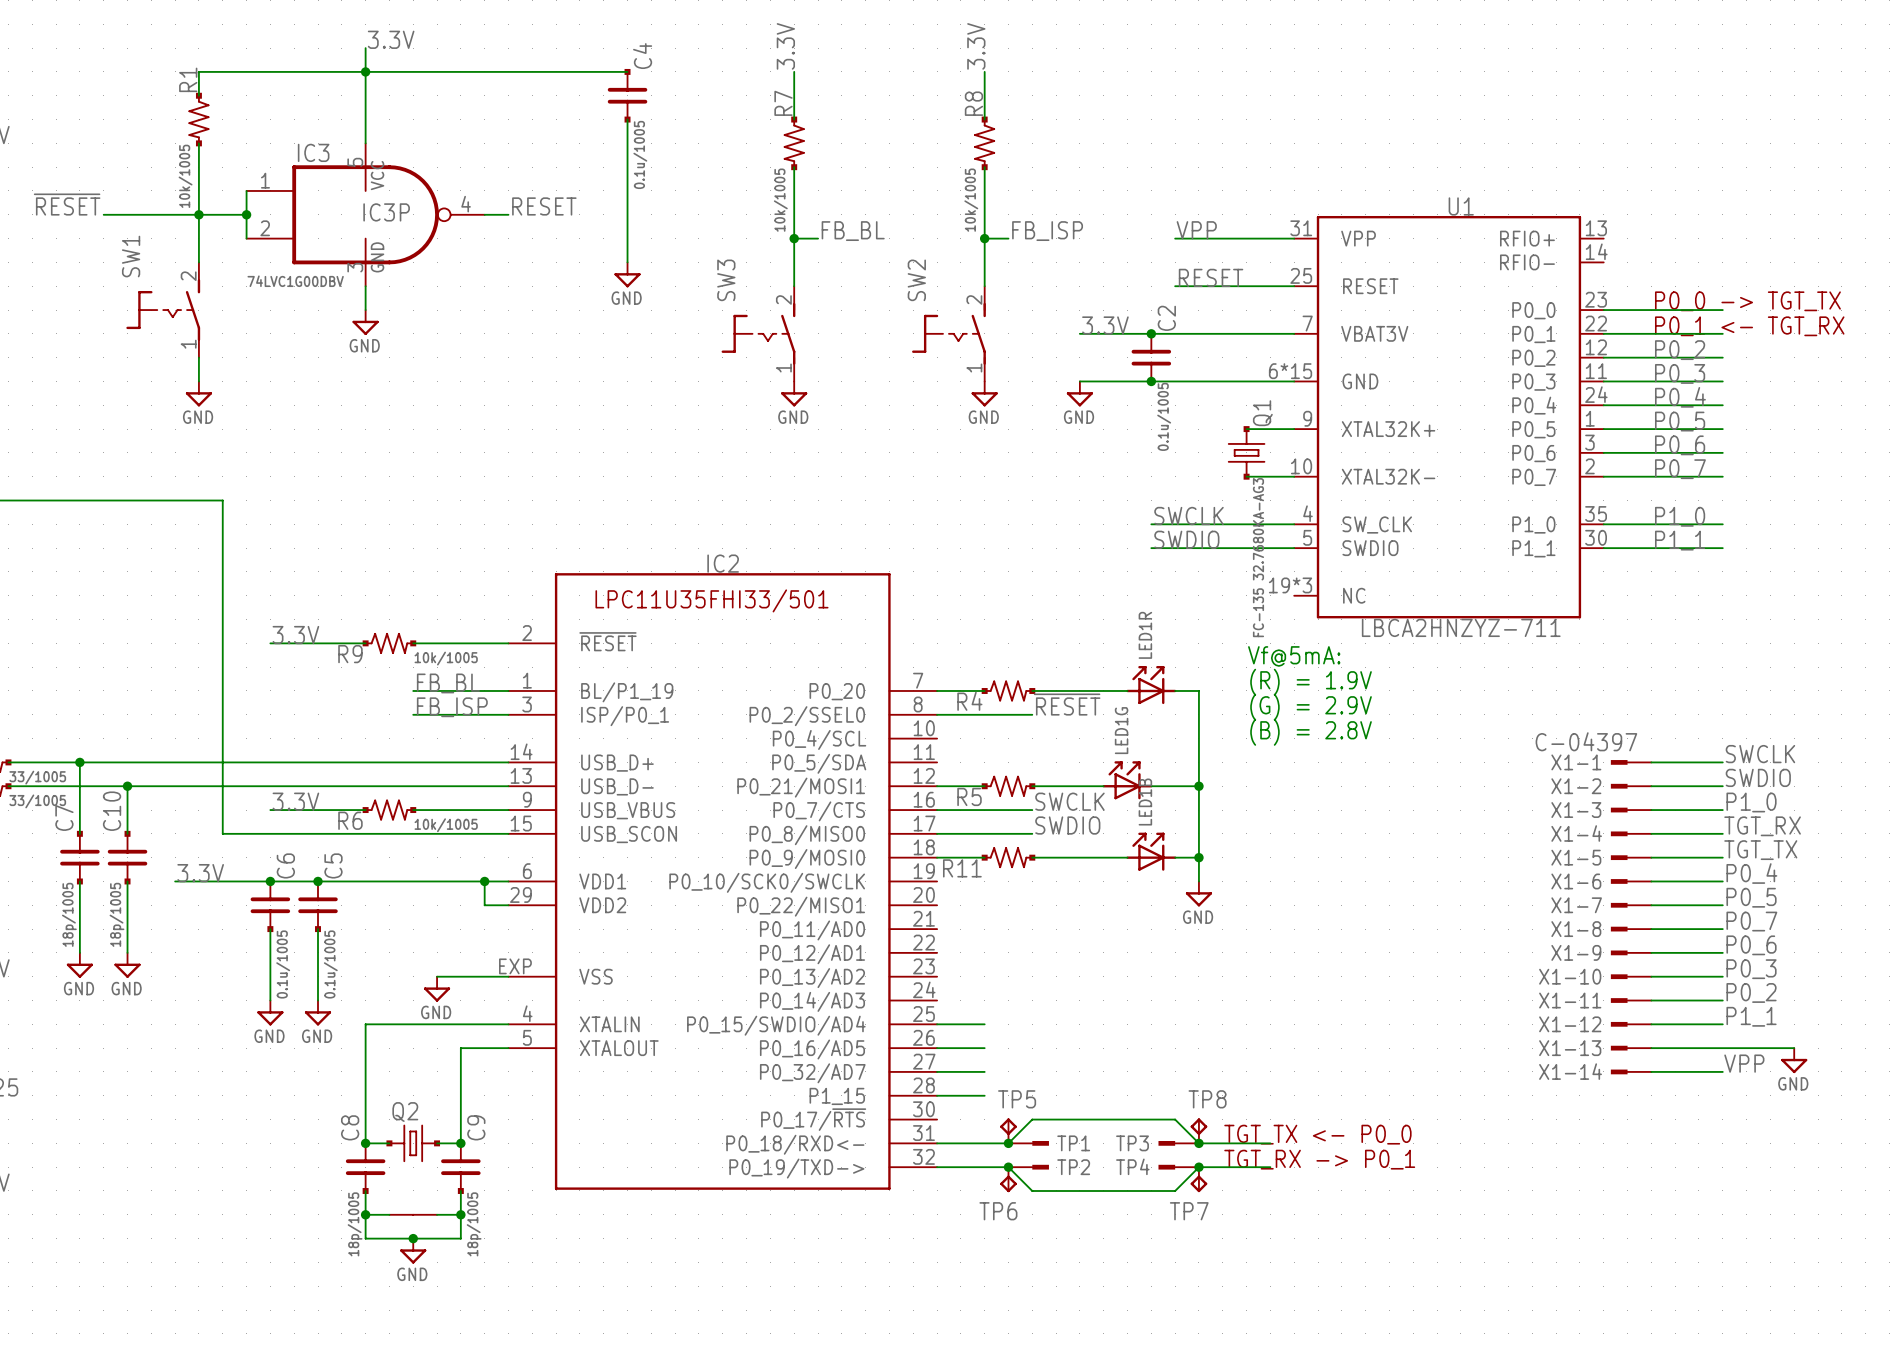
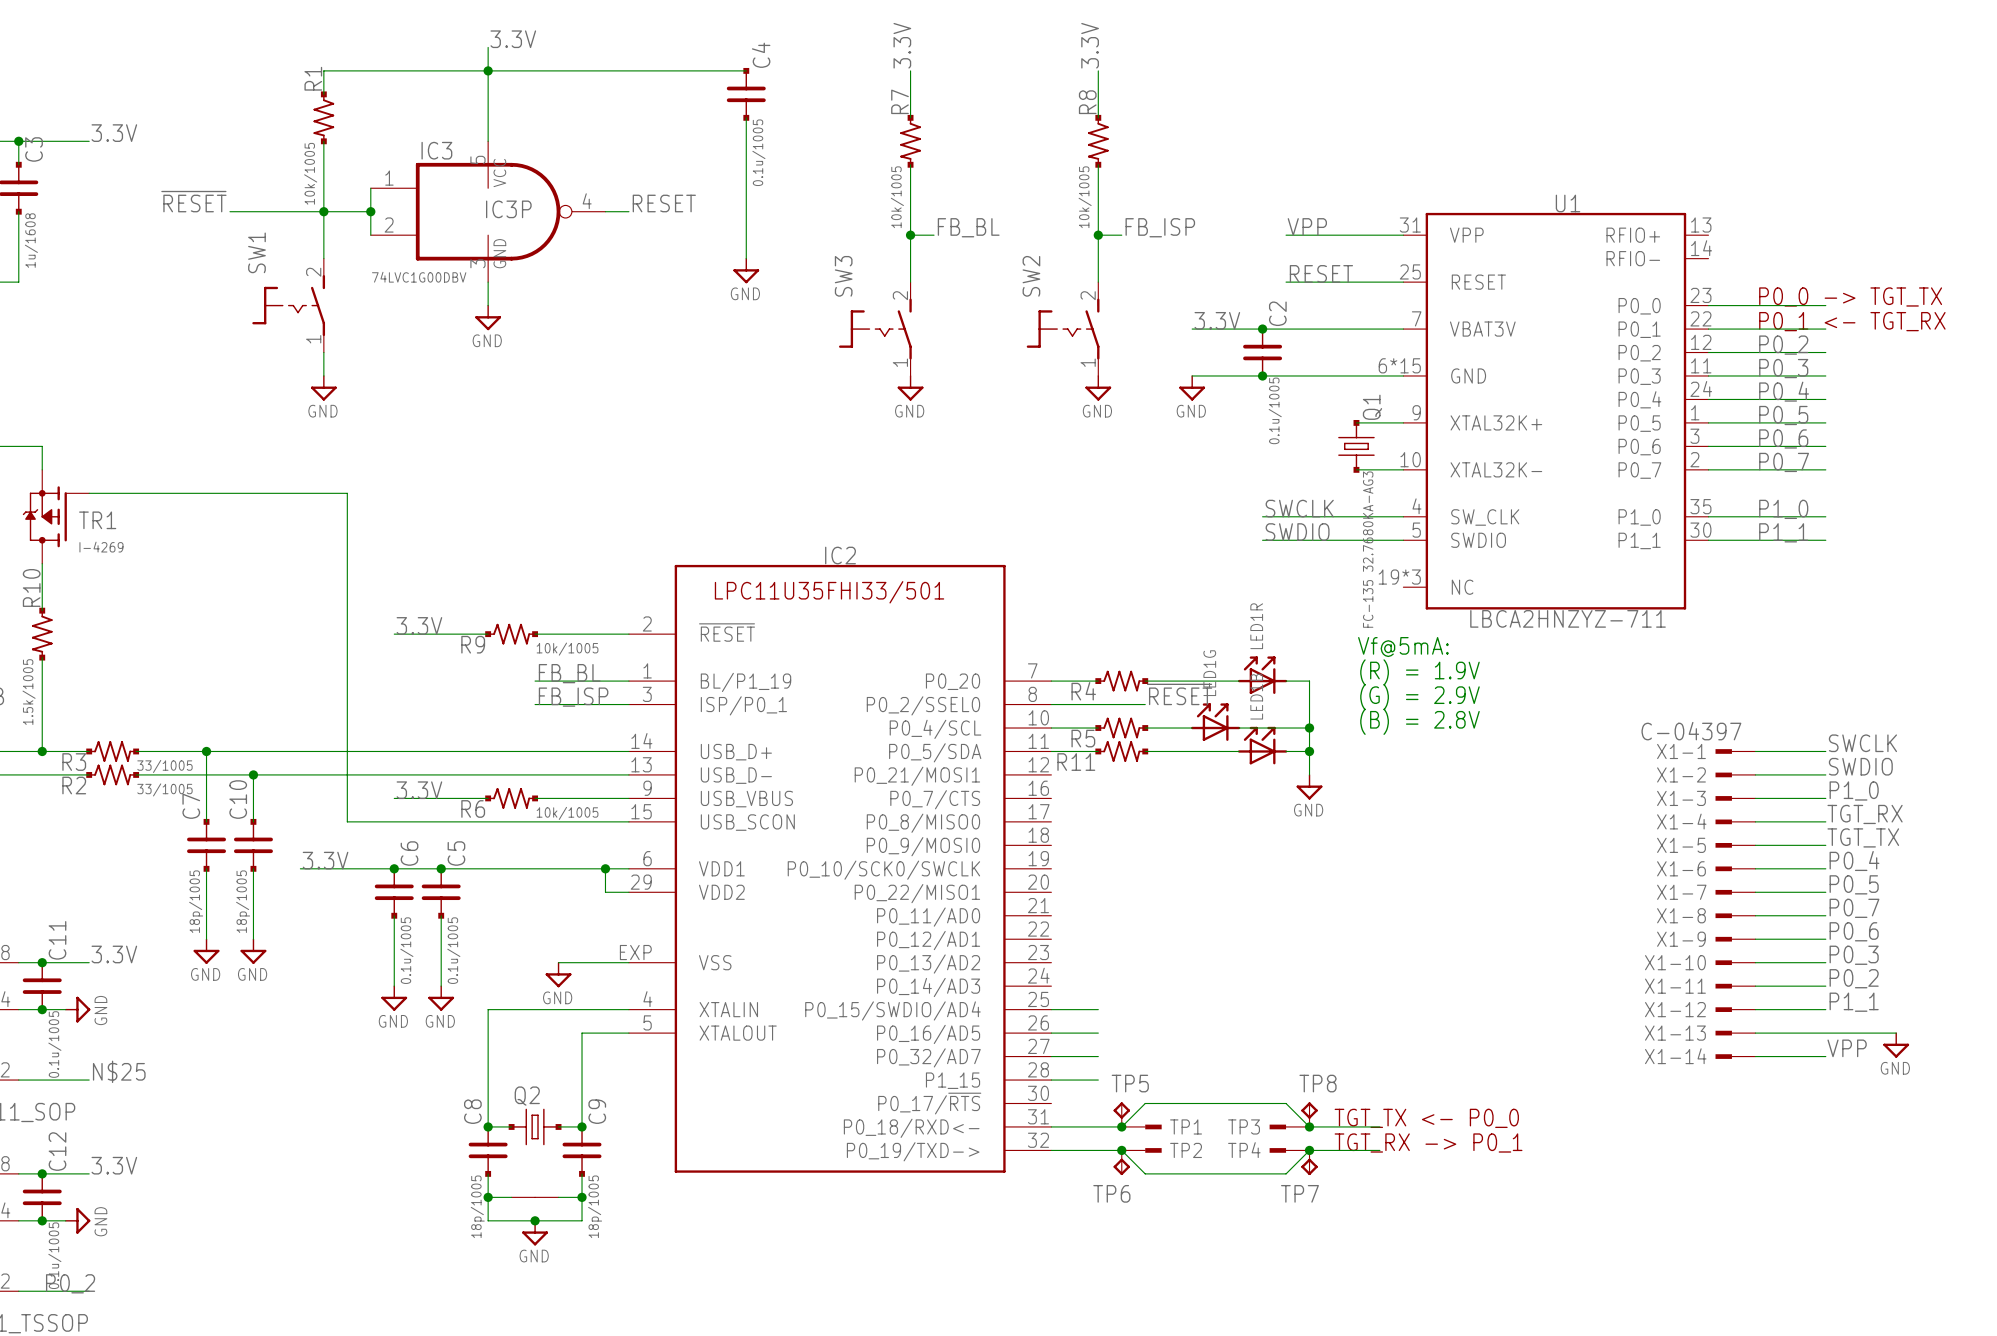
wire: none -> (1051, 728) (1098, 728)
junction: none -> (1309, 728)
junction: none -> (1309, 751)
LED1G position: (1127, 780) -> (1215, 722)
wire: (937, 786) (984, 786) -> (1145, 728) (1192, 728)
R5 position: (1008, 786) -> (1121, 728)
wire: (1032, 786) (1103, 786) -> (1239, 728) (1309, 728)
wire: (1151, 786) (1198, 786) (1198, 881) -> none
junction: (1198, 786) -> none
label: SWCLK (1069, 801) -> none
wire: (937, 810) (1032, 810) -> none
label: SWDIO (1067, 825) -> none
wire: (937, 833) (1032, 833) -> none
LED1B position: (1151, 851) -> (1262, 745)
wire: (937, 857) (984, 857) -> (1051, 751) (1098, 751)
R11 position: (1008, 857) -> (1121, 751)
wire: (1032, 857) (1127, 857) -> (1145, 751) (1239, 751)
wire: (1175, 857) (1198, 857) -> (1286, 751) (1309, 751)
junction: (1198, 857) -> none
power symbol position: GND (1198, 893) -> GND (1309, 786)

